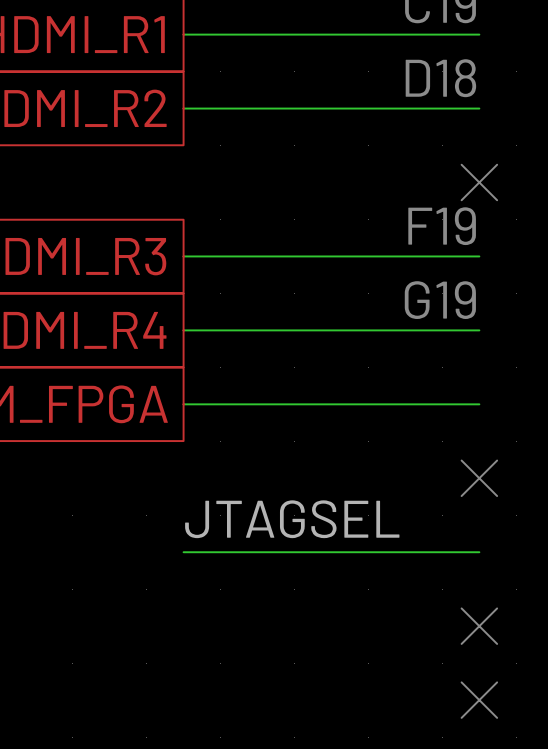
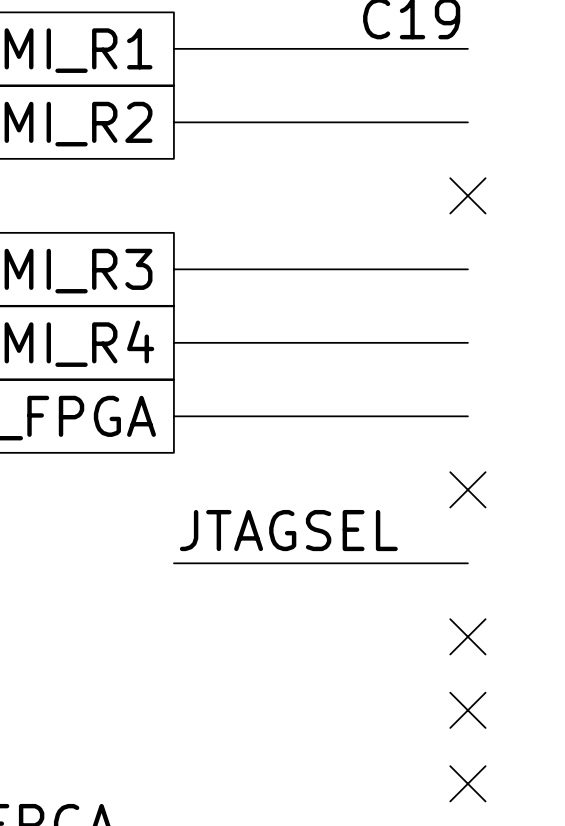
text: D18 (440, 78) -> none
text: F19 (442, 226) -> none
text: G19 (440, 300) -> none

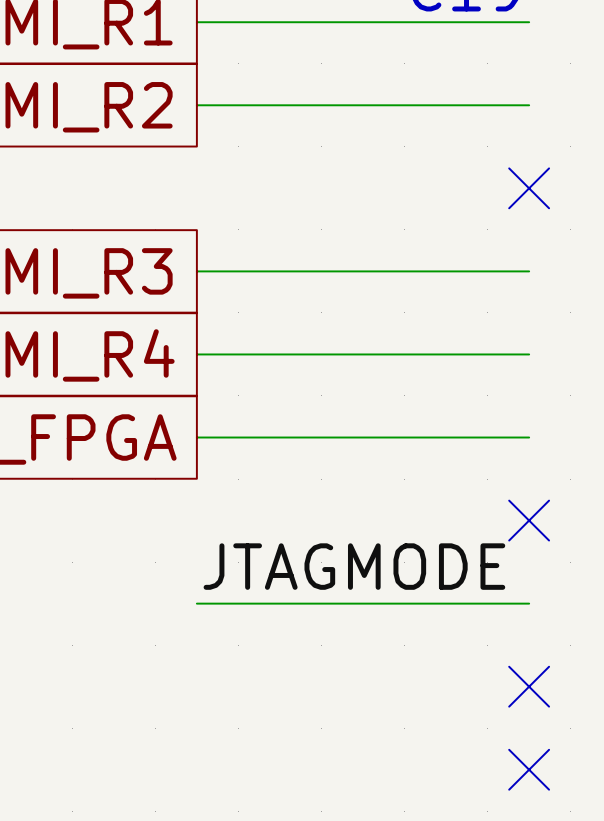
label: JTAGSEL (288, 530) -> JTAGMODE (354, 566)

